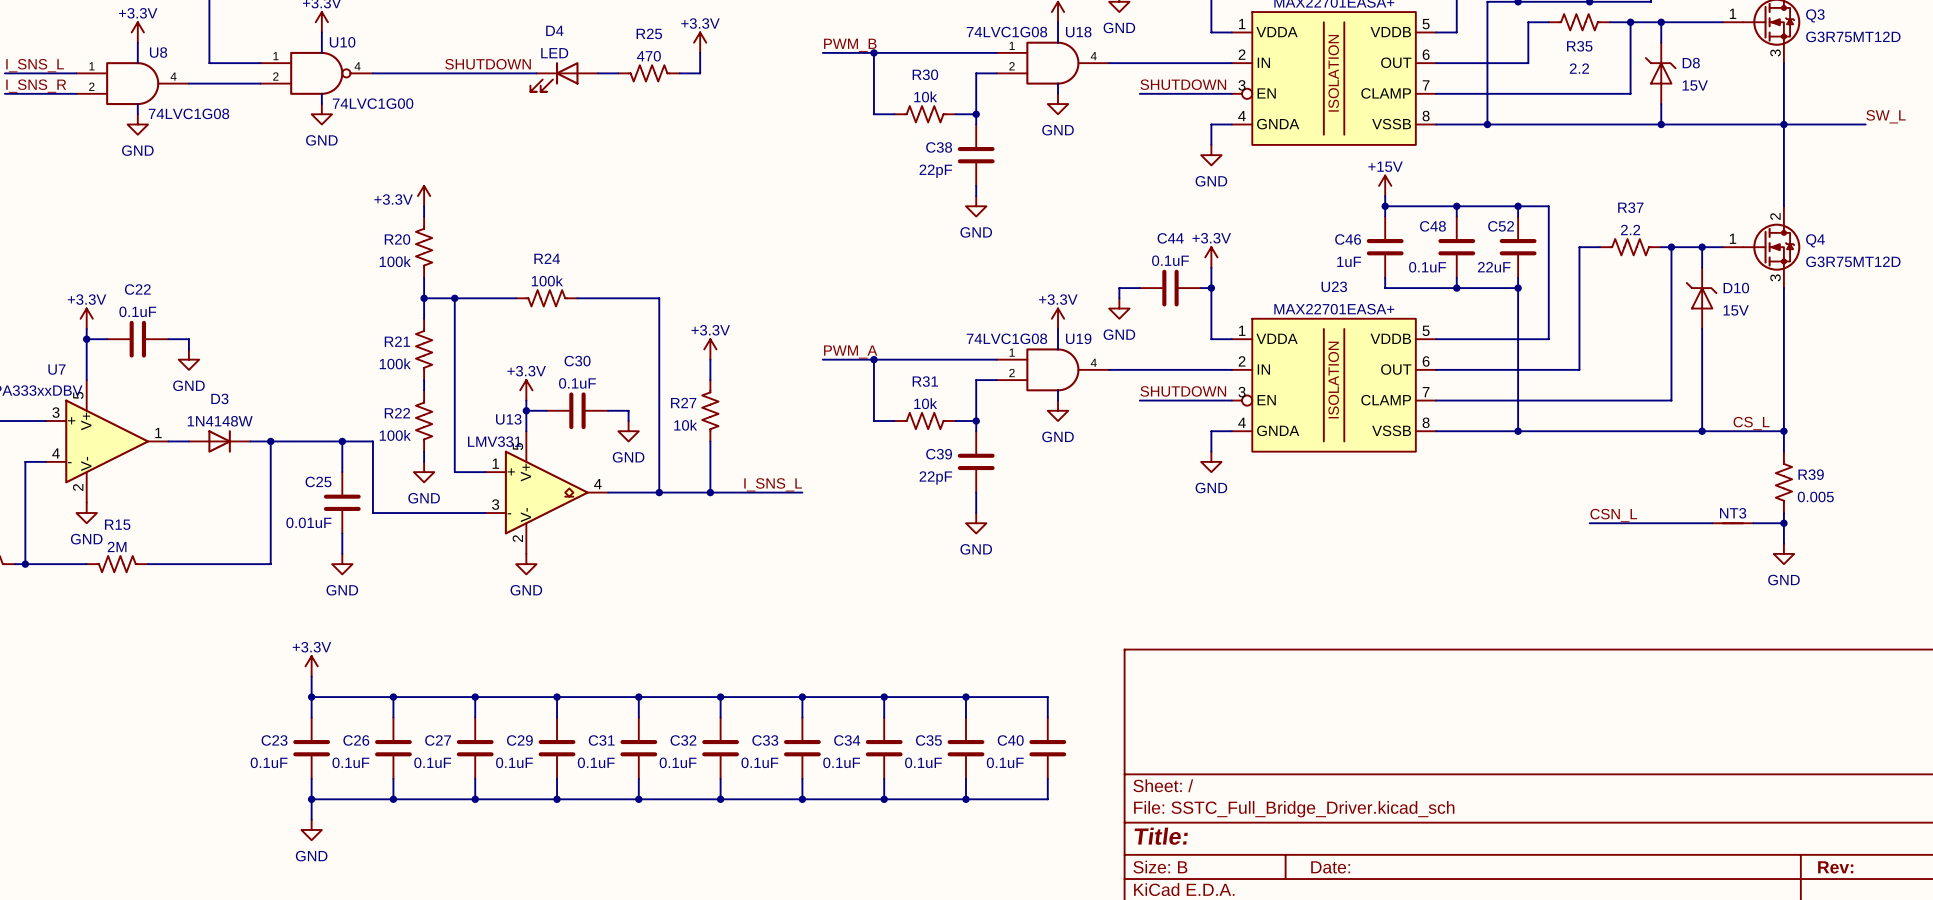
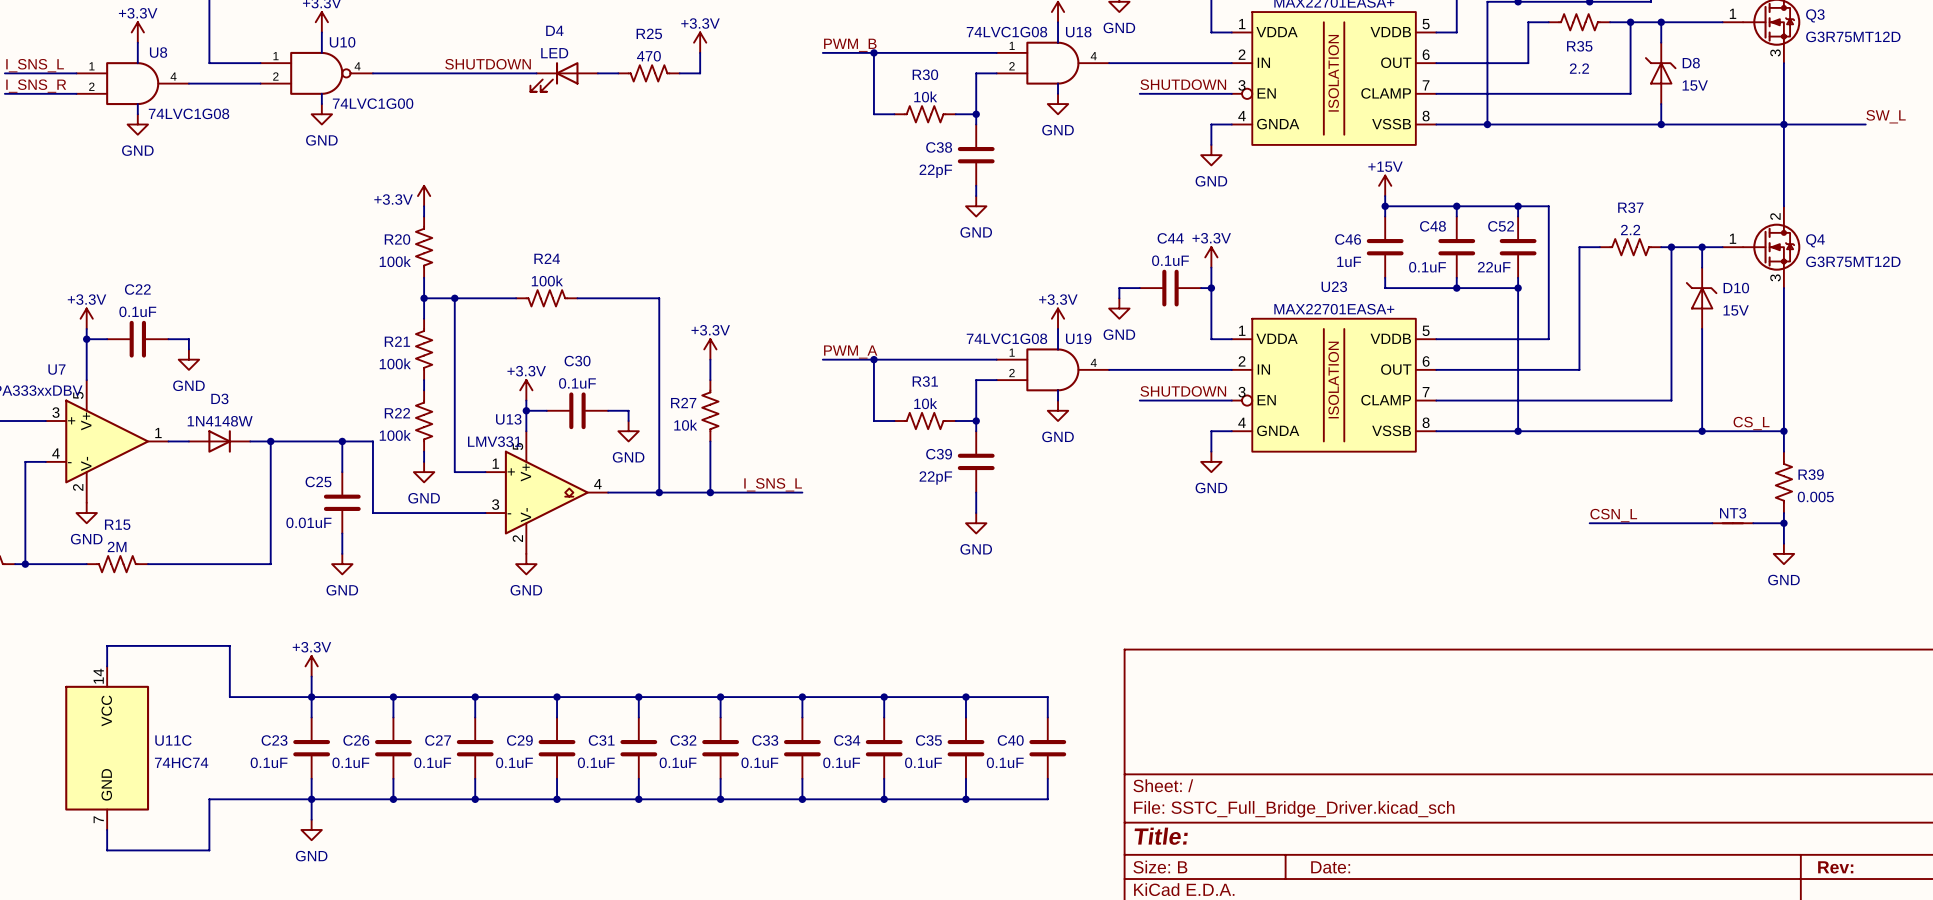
wire: none -> (107, 666) (107, 645) (229, 645) (229, 697) (311, 697)
U11C: none -> 74HC74 (107, 748)
wire: none -> (311, 799) (209, 799) (209, 850) (107, 850) (107, 829)

